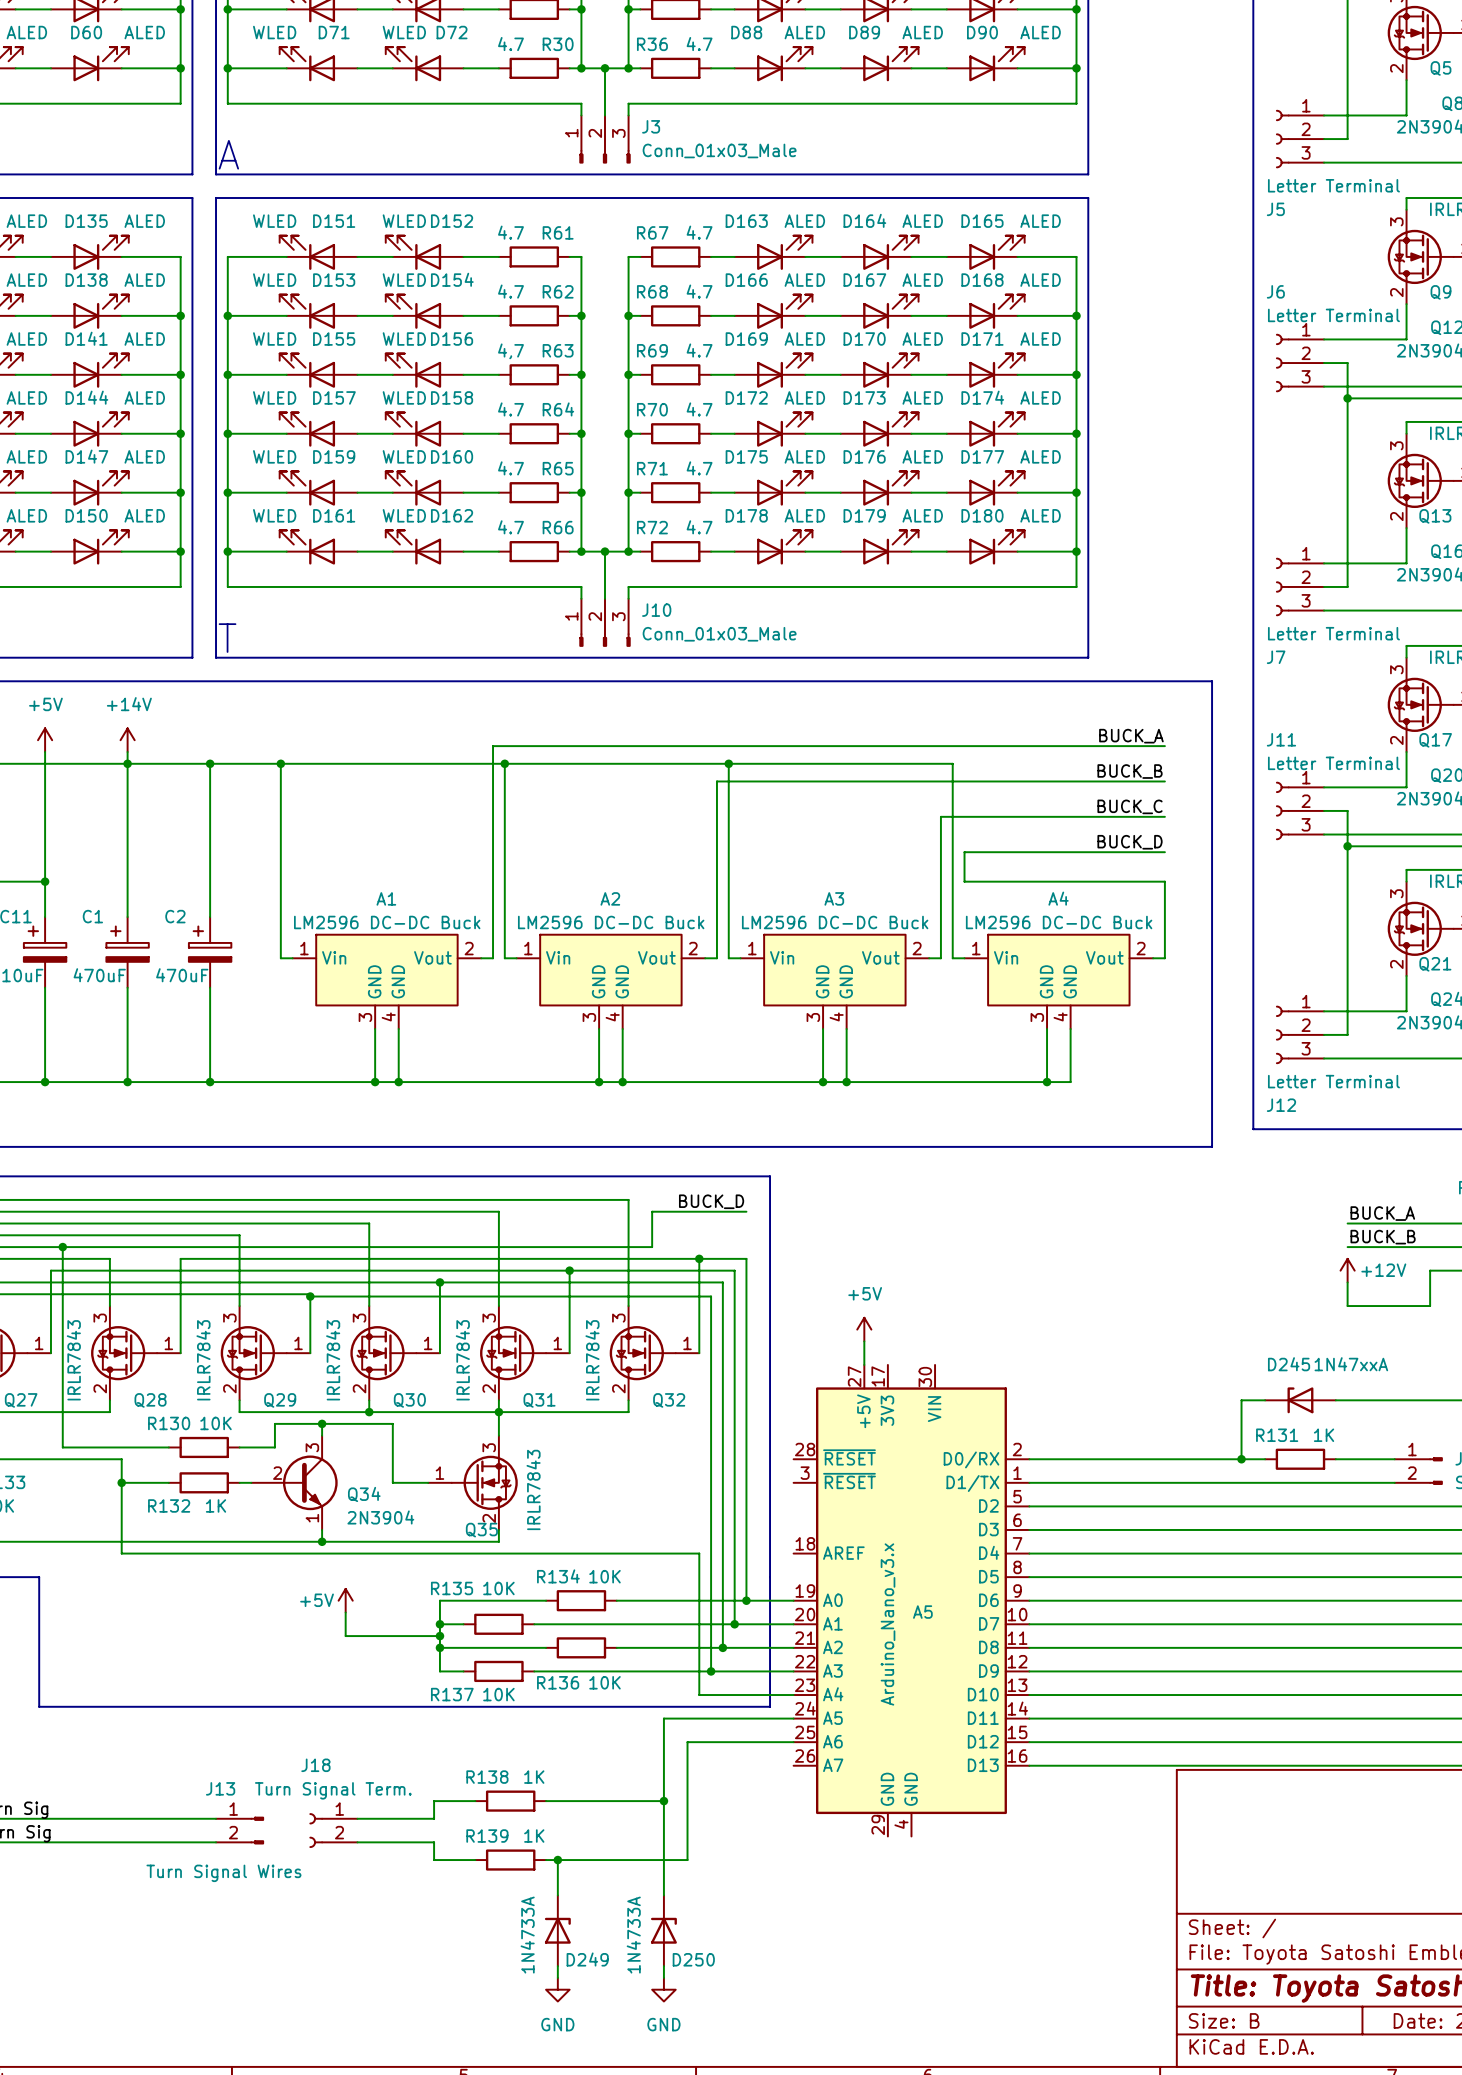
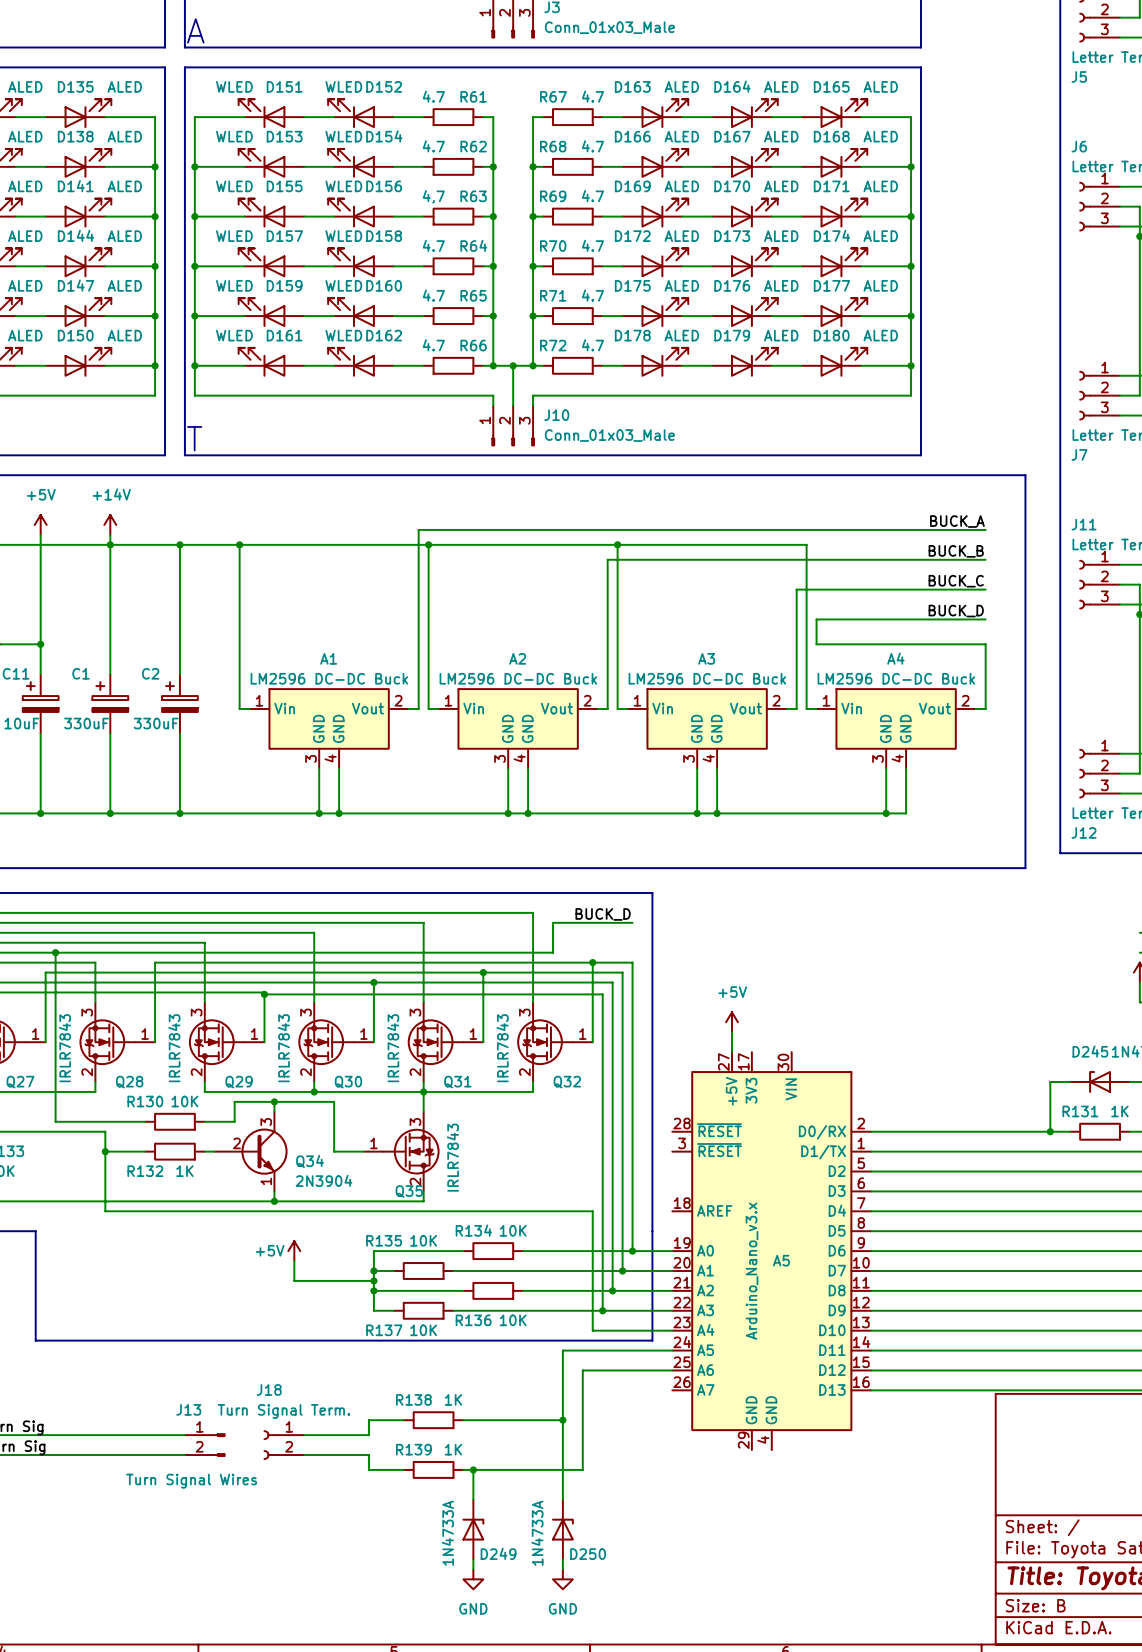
C1 value: 470uF (99, 975) -> 330uF (86, 723)
C2 value: 470uF (182, 975) -> 330uF (156, 723)

